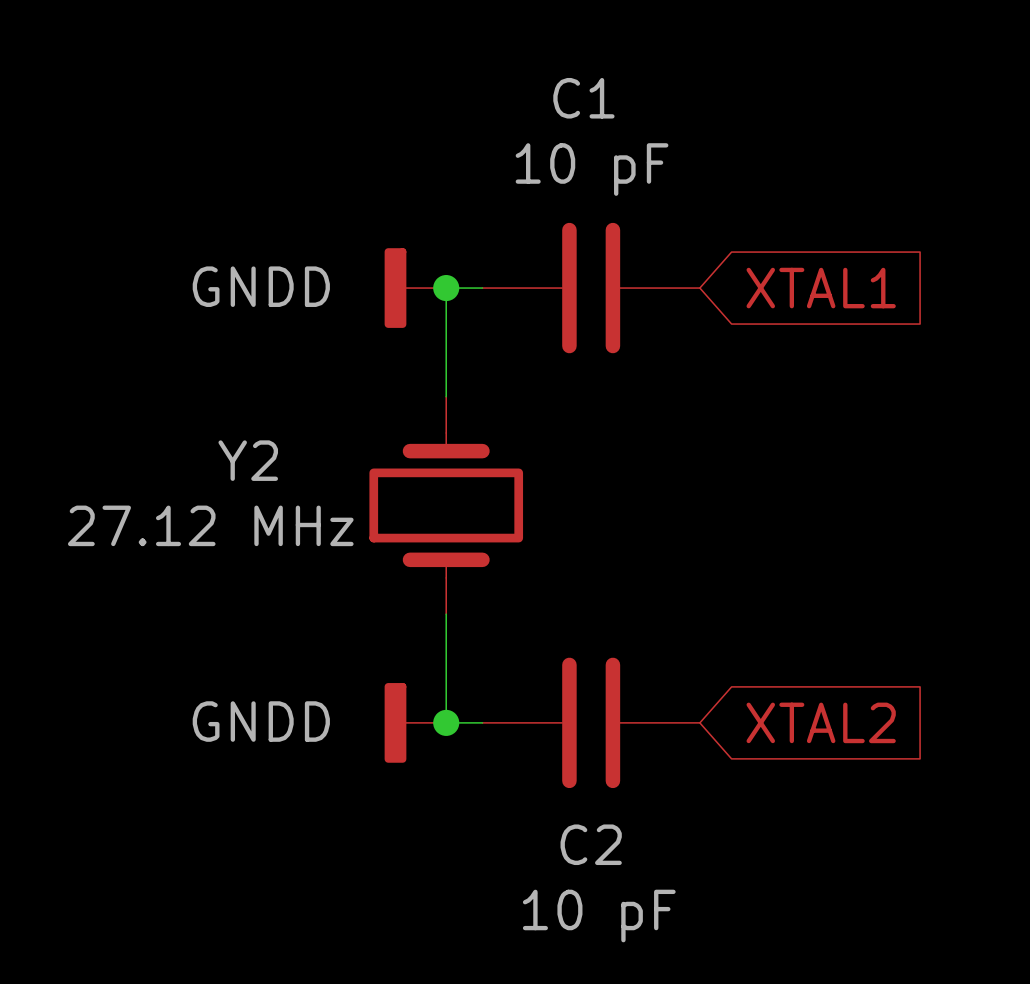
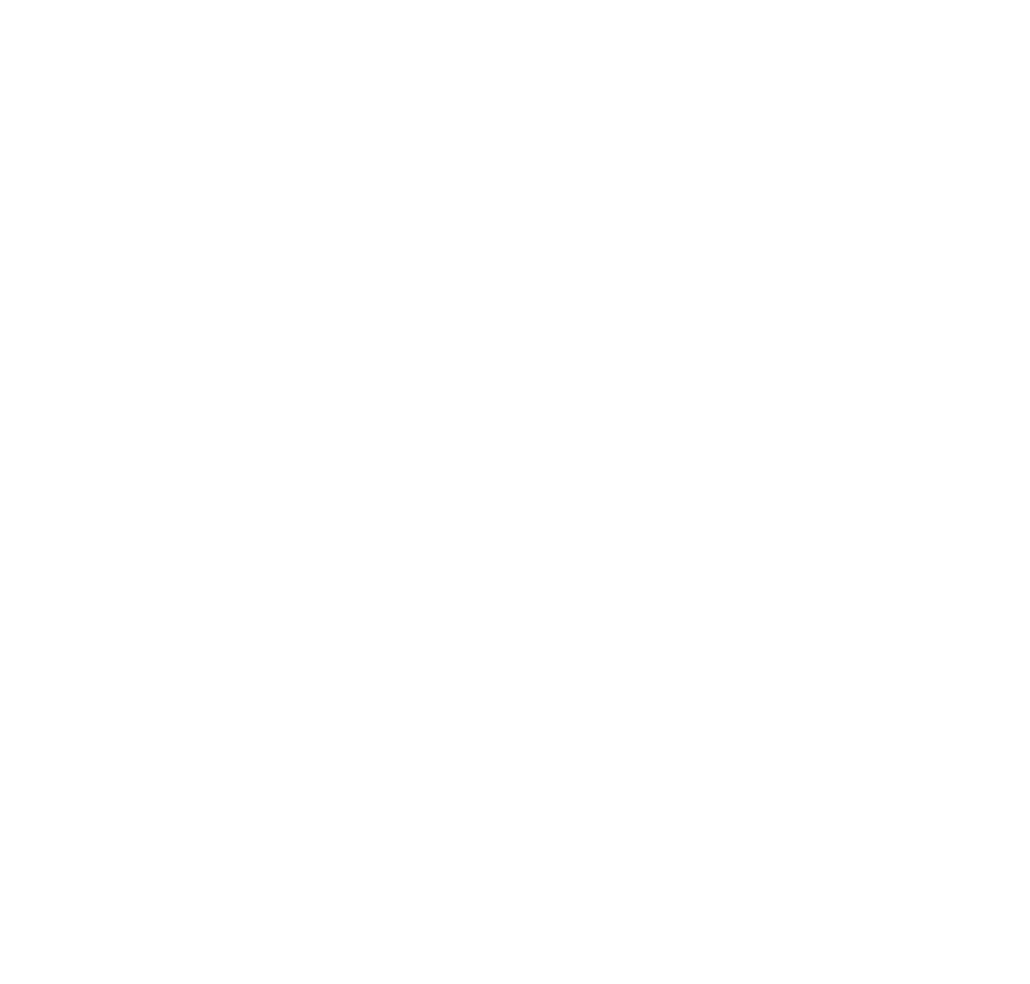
power symbol: GNDD (415, 288) -> none
junction: (446, 288) -> none
wire: (482, 288) (446, 288) (446, 396) -> none
C1: 10 pF (591, 288) -> none
global label: XTAL1 (821, 288) -> none
Y2: 27.12 MHz (446, 505) -> none
wire: (446, 614) (446, 722) (482, 722) -> none
power symbol: GNDD (415, 722) -> none
junction: (446, 722) -> none
C2: 10 pF (591, 722) -> none
global label: XTAL2 (821, 722) -> none

